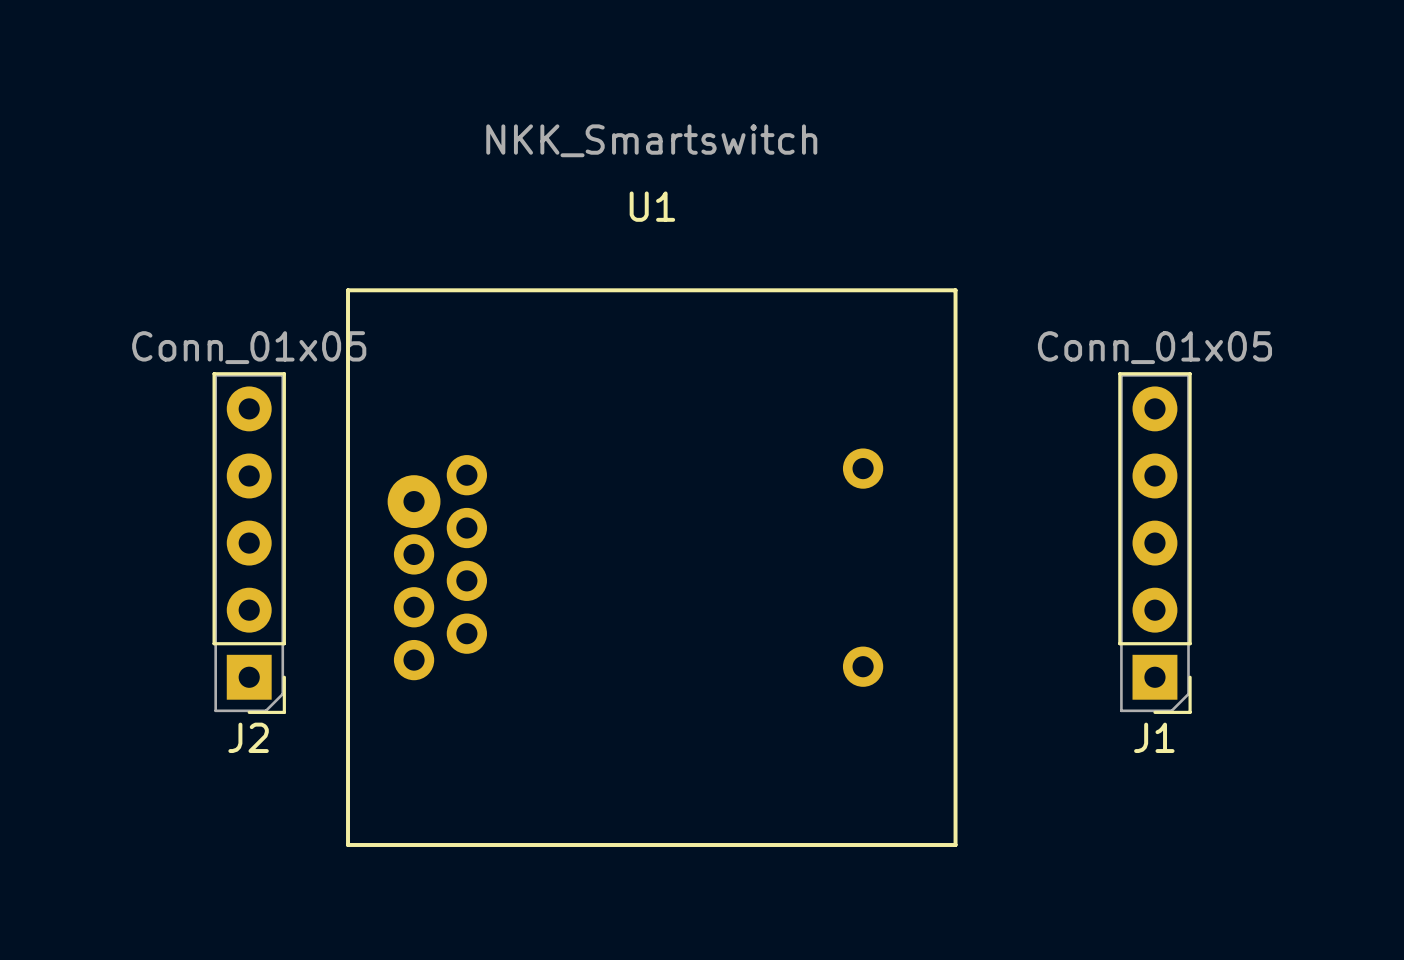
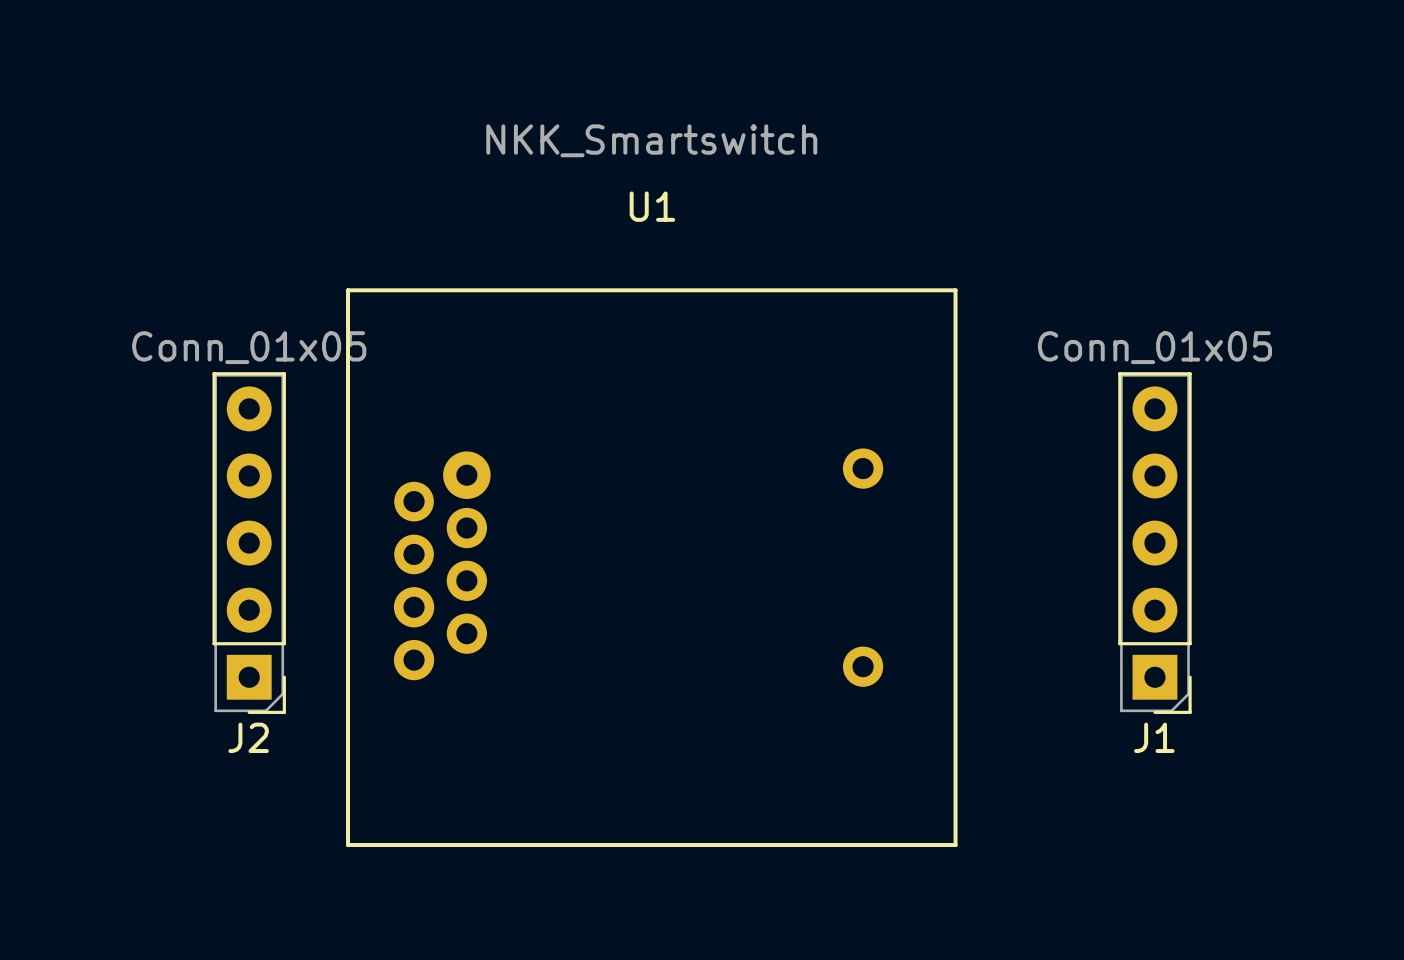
U1 footprint: [346, 288, 958, 847] -> [346, 288, 958, 847]

